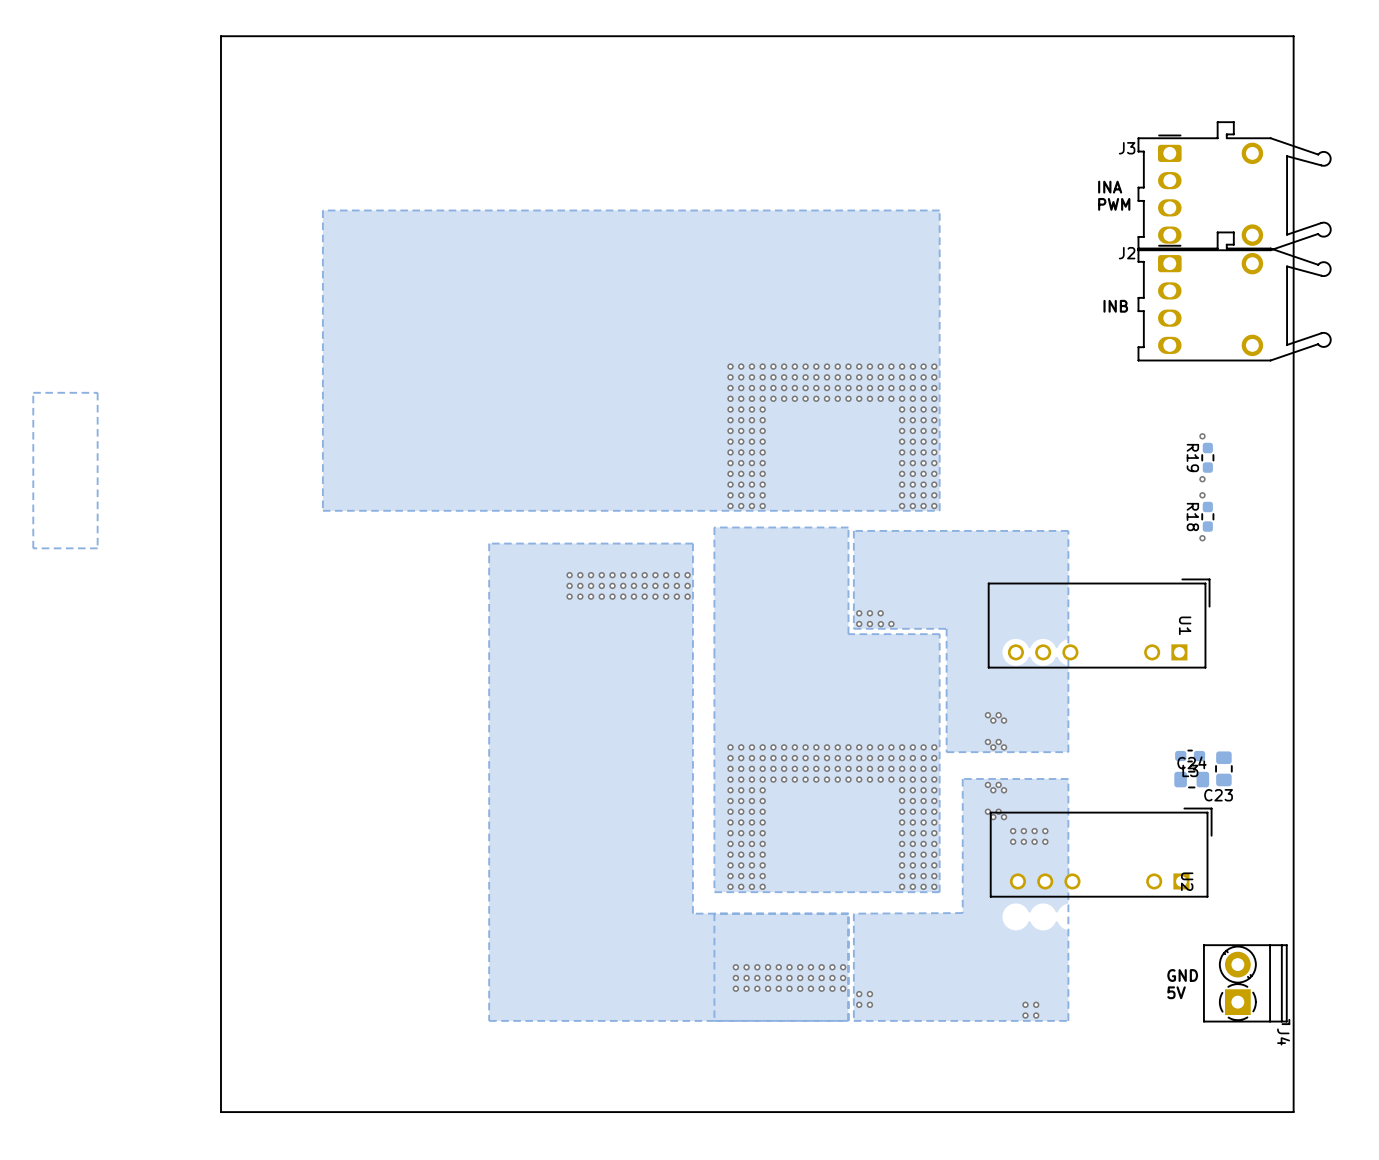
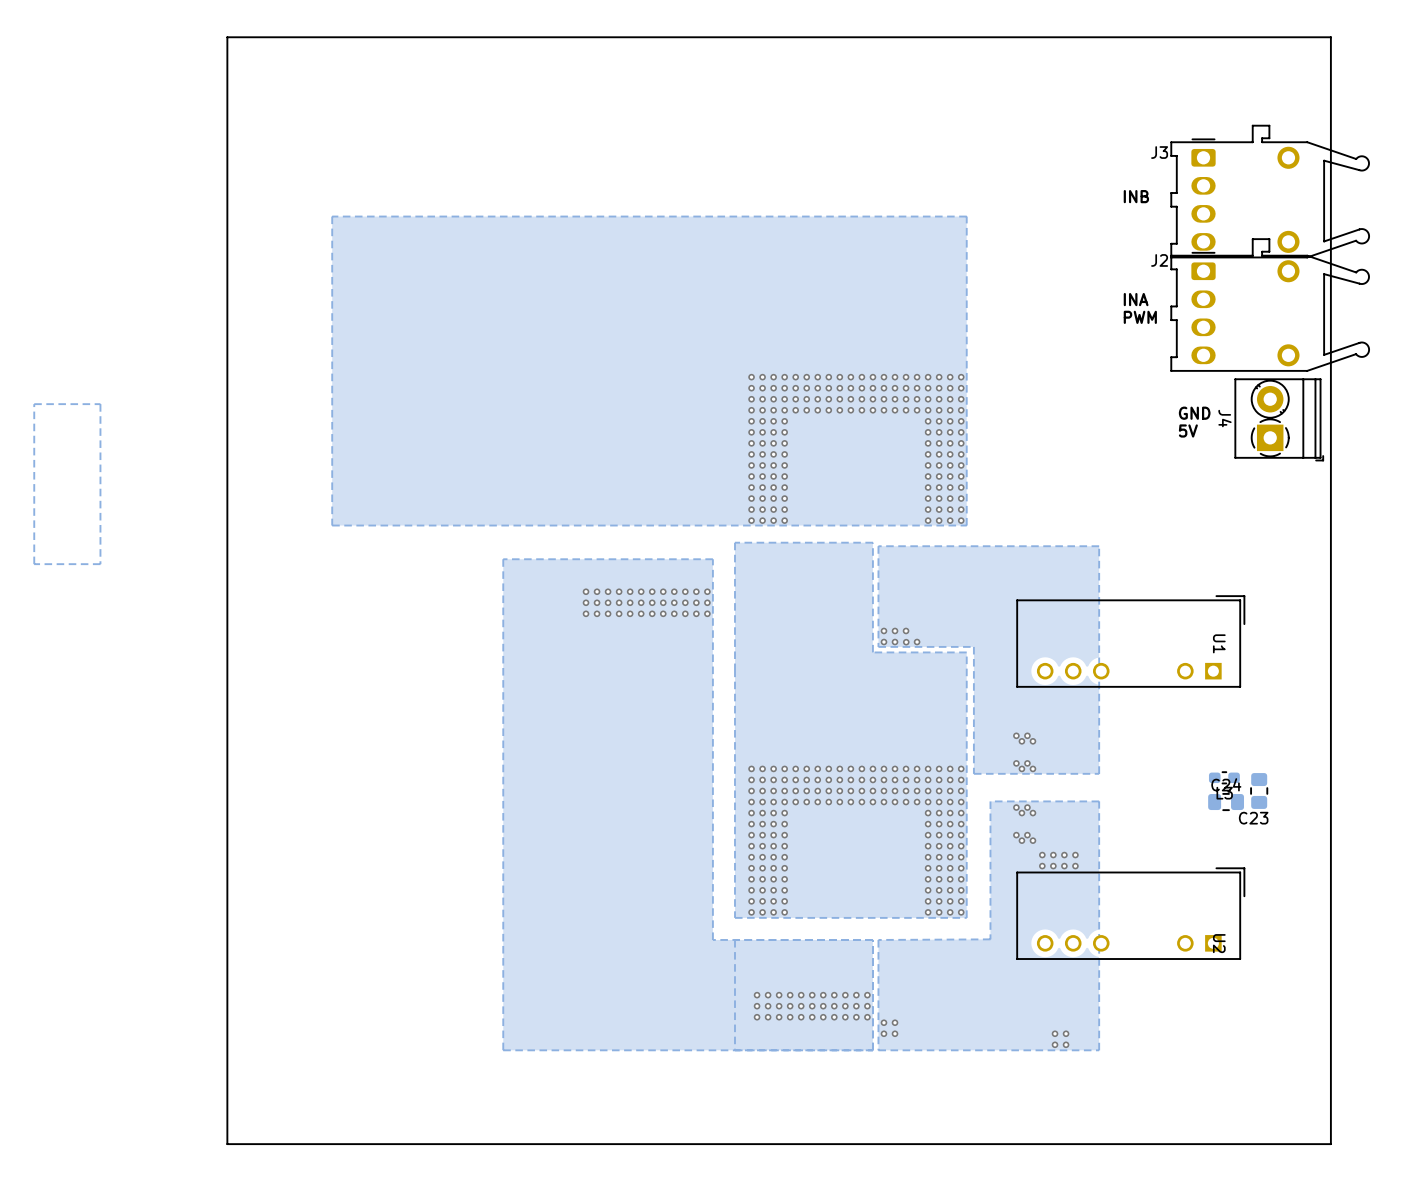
text position: INA (1110, 187) -> INA (1136, 299)
text position: PWM (1114, 204) -> PWM (1140, 317)
text position: INB (1115, 306) -> INB (1136, 196)
text: none -> GND (1194, 413)
text: none -> 5V (1188, 430)
via: (1202, 436) -> none
R19: (1207, 457) -> none
via: (1202, 479) -> none
via: (1202, 495) -> none
R18: (1207, 516) -> none
via: (1202, 538) -> none
U2 position: (1101, 852) -> (1130, 913)
text: GND (1182, 975) -> none
J4 position: (1246, 984) -> (1279, 419)
text: 5V (1176, 992) -> none
J4 name position: J4 (1283, 1036) -> J4 (1224, 418)

